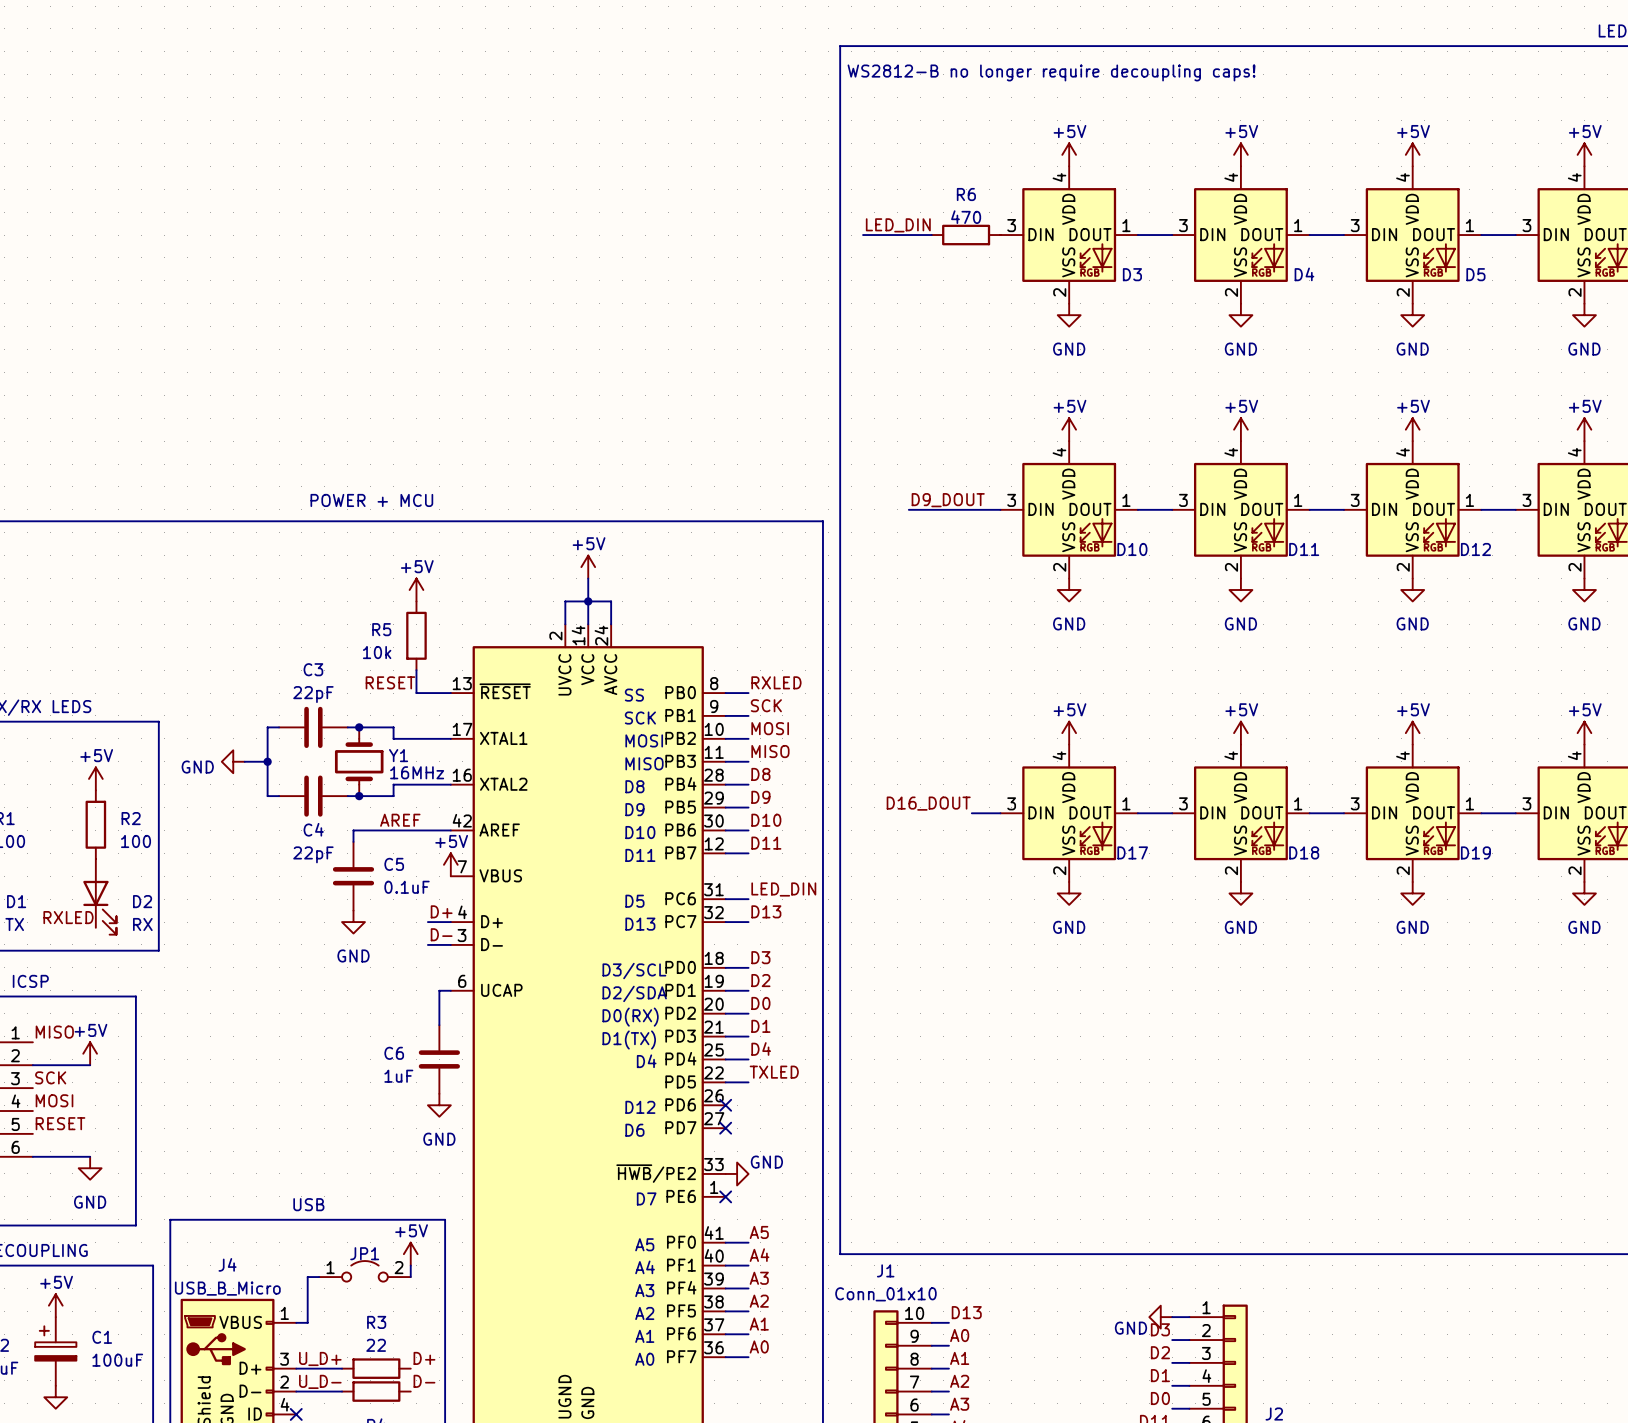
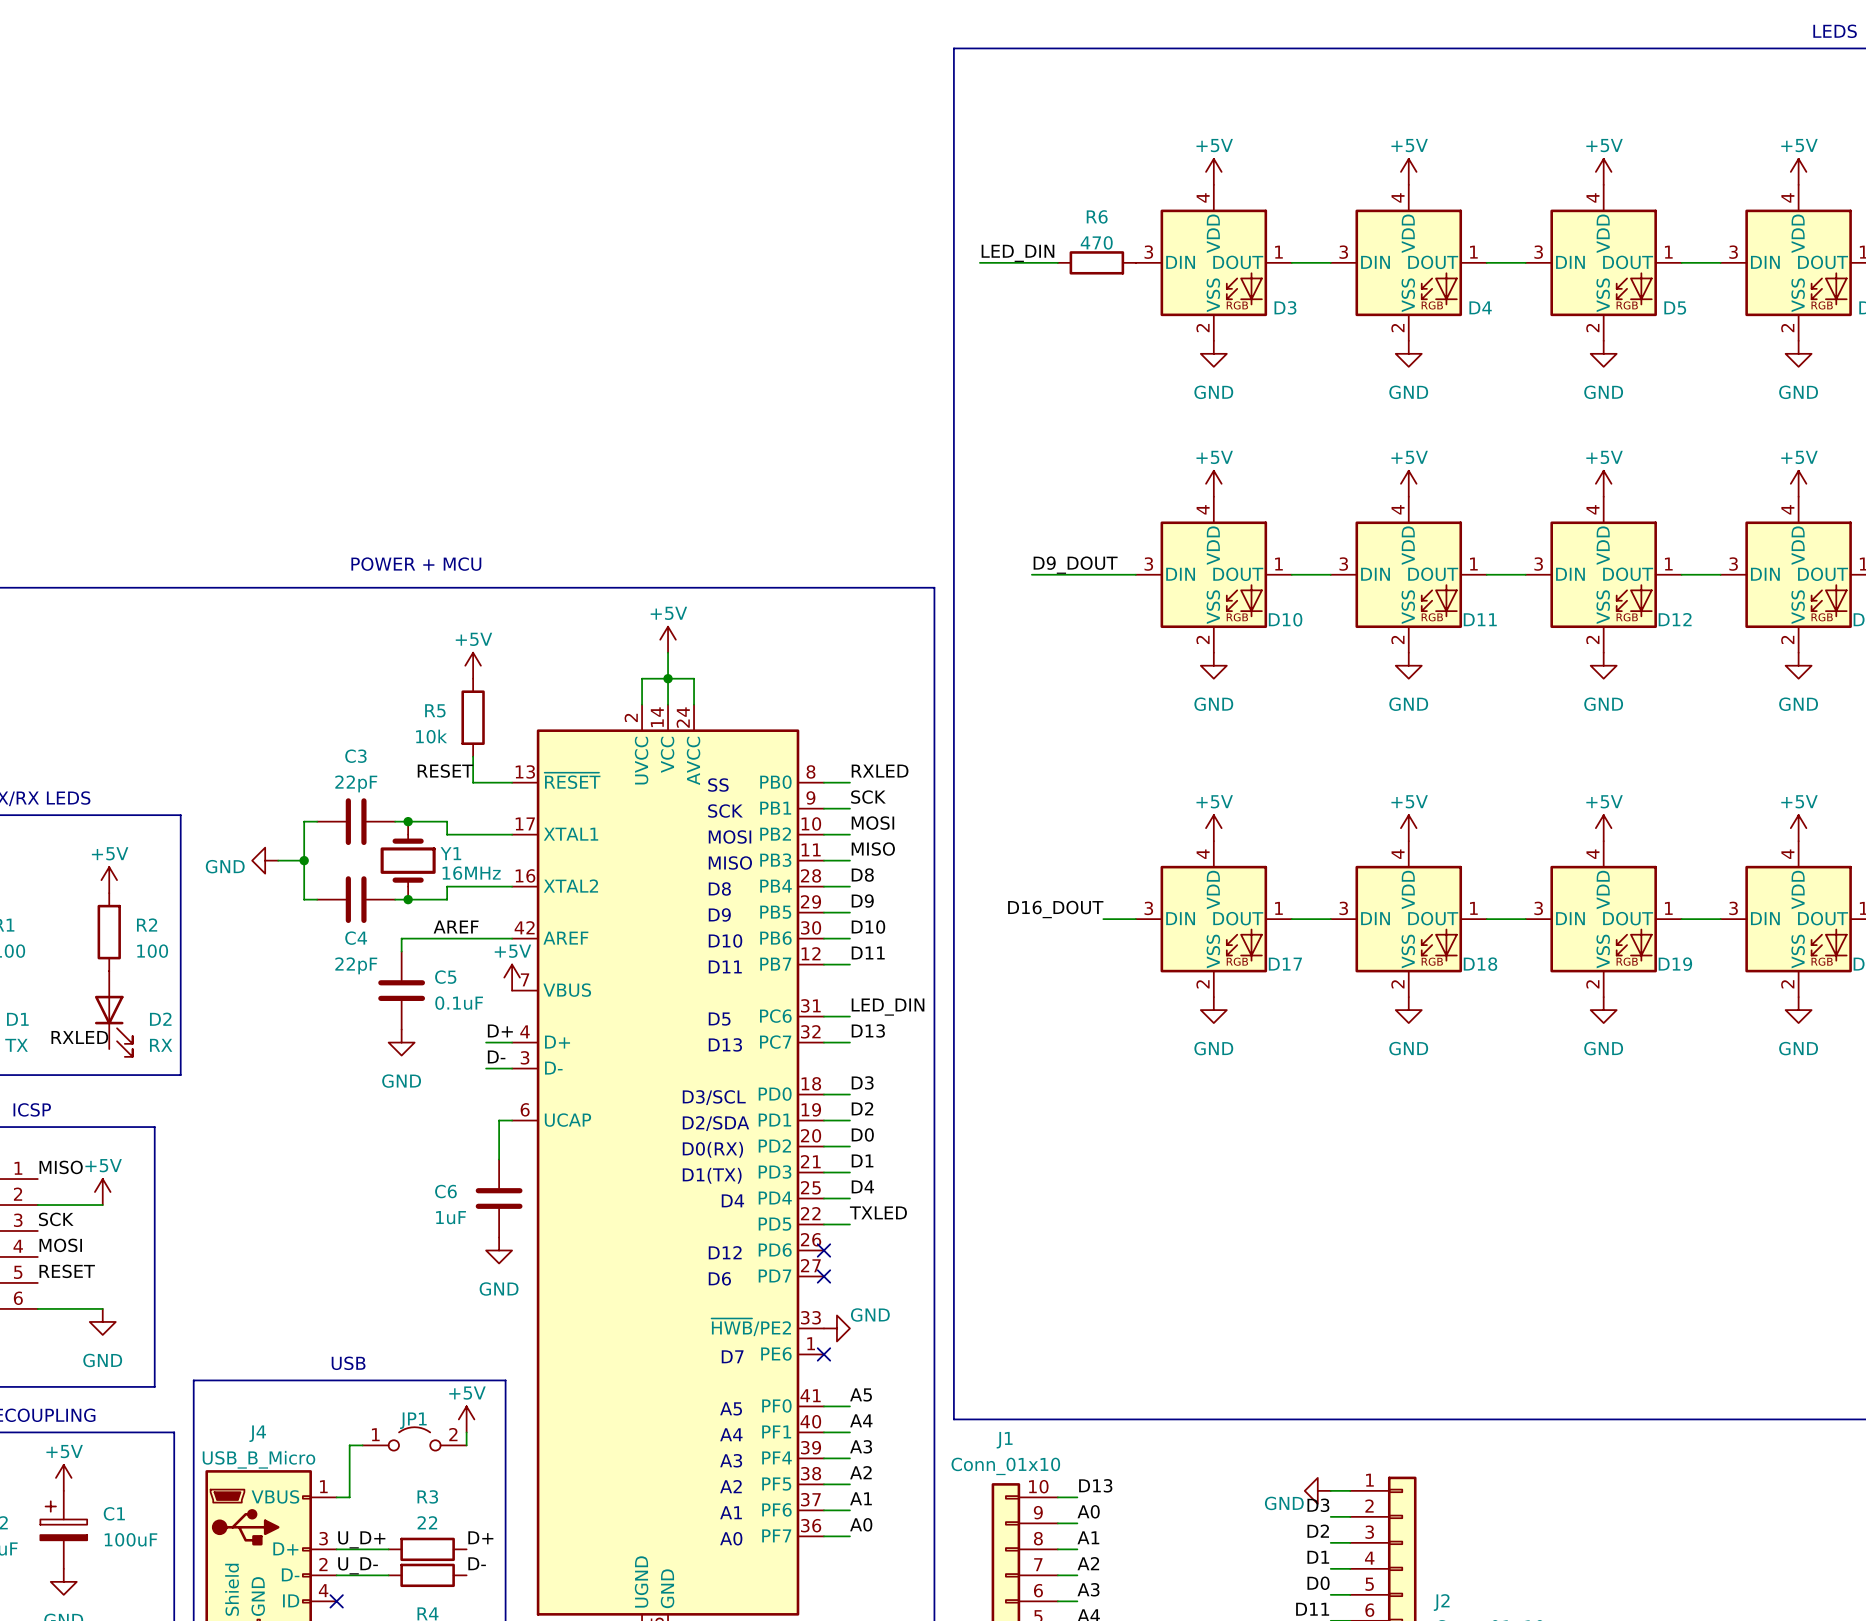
text: WS2812-B no longer require decoupling caps! (1051, 72) -> none

